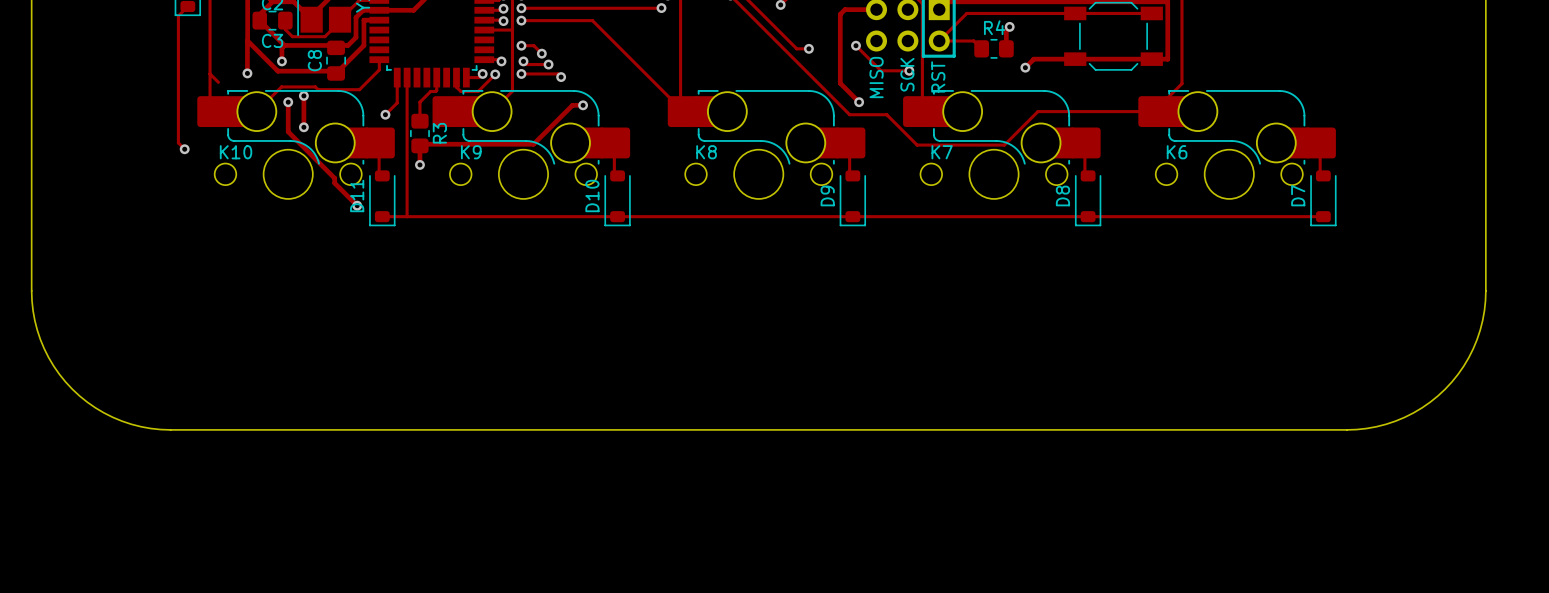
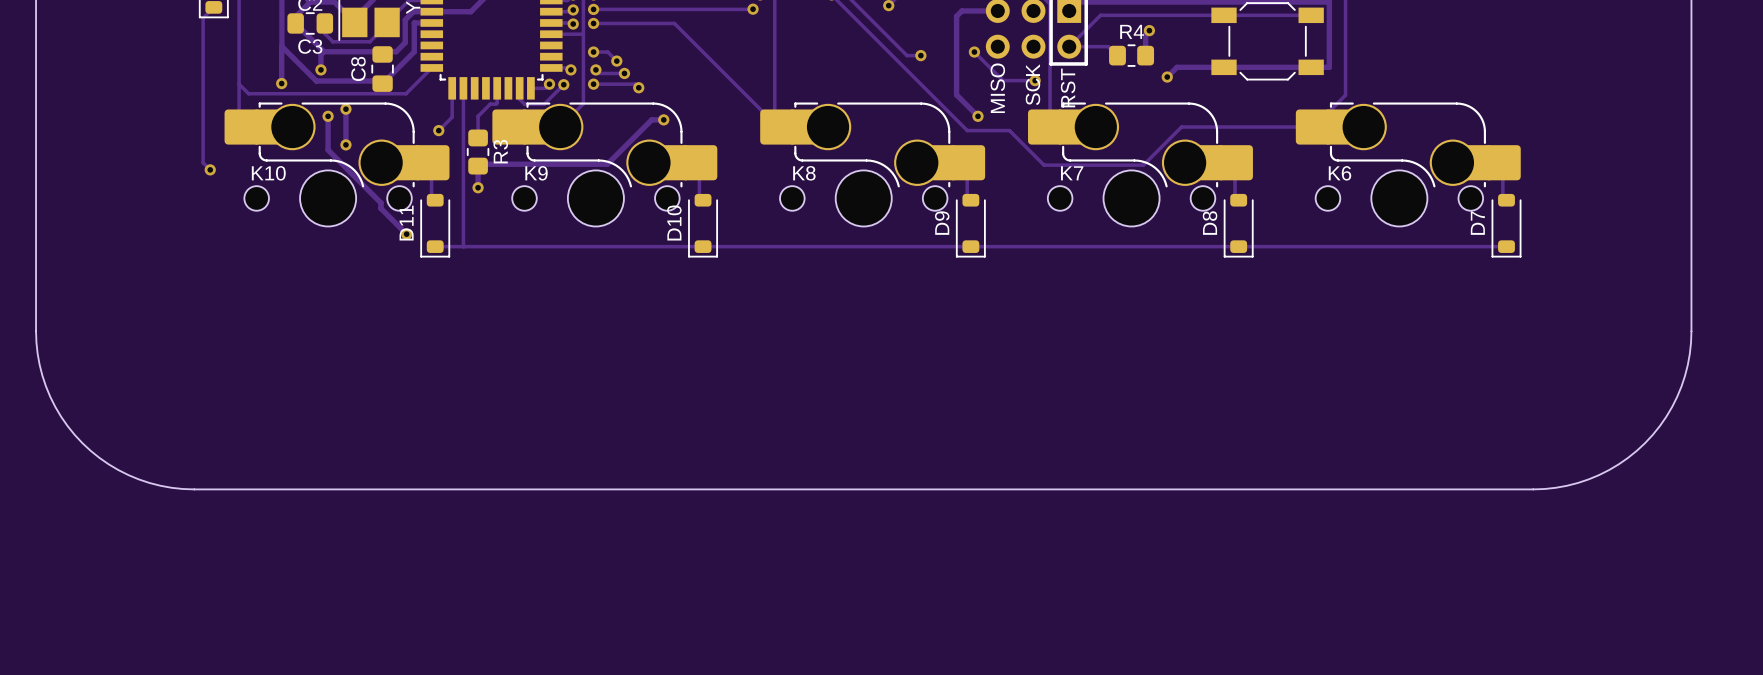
track: (379, 59) (379, 69) (359, 89) (281, 86) (256, 111) -> (431, 67) (406, 93) (248, 93)

